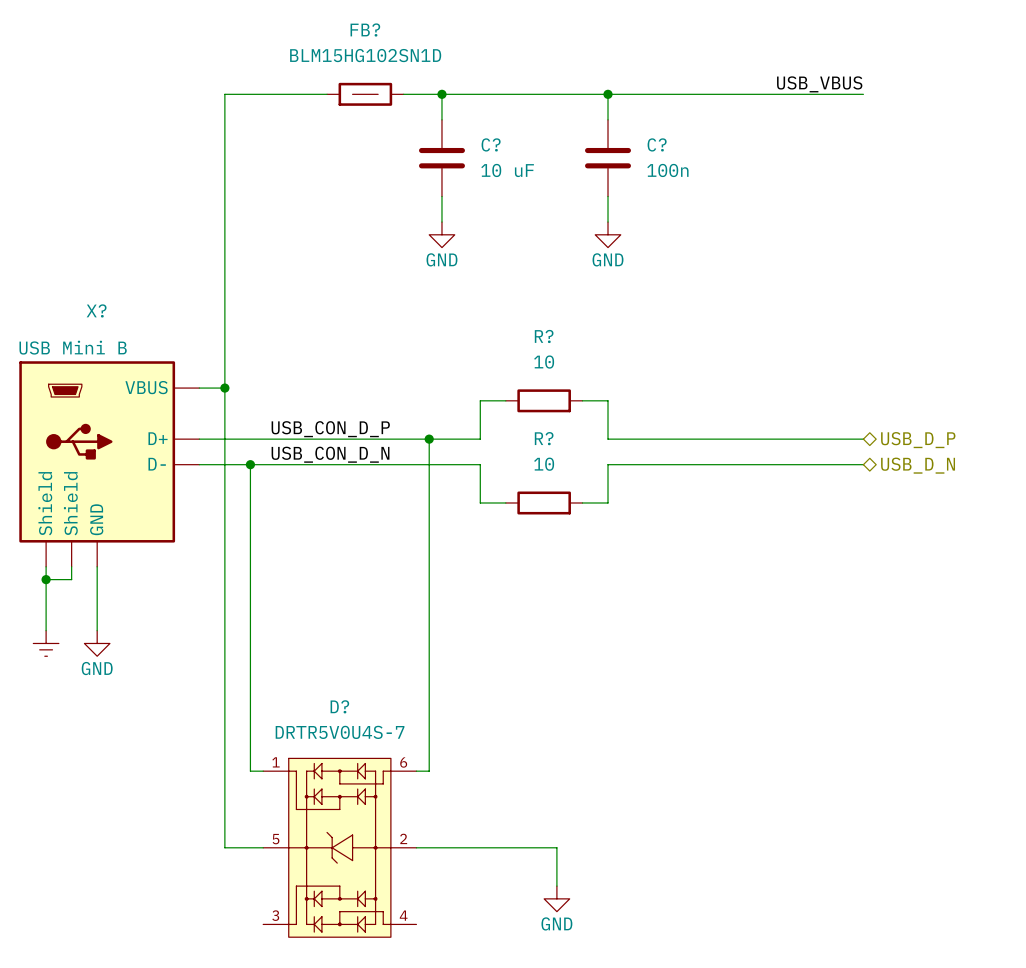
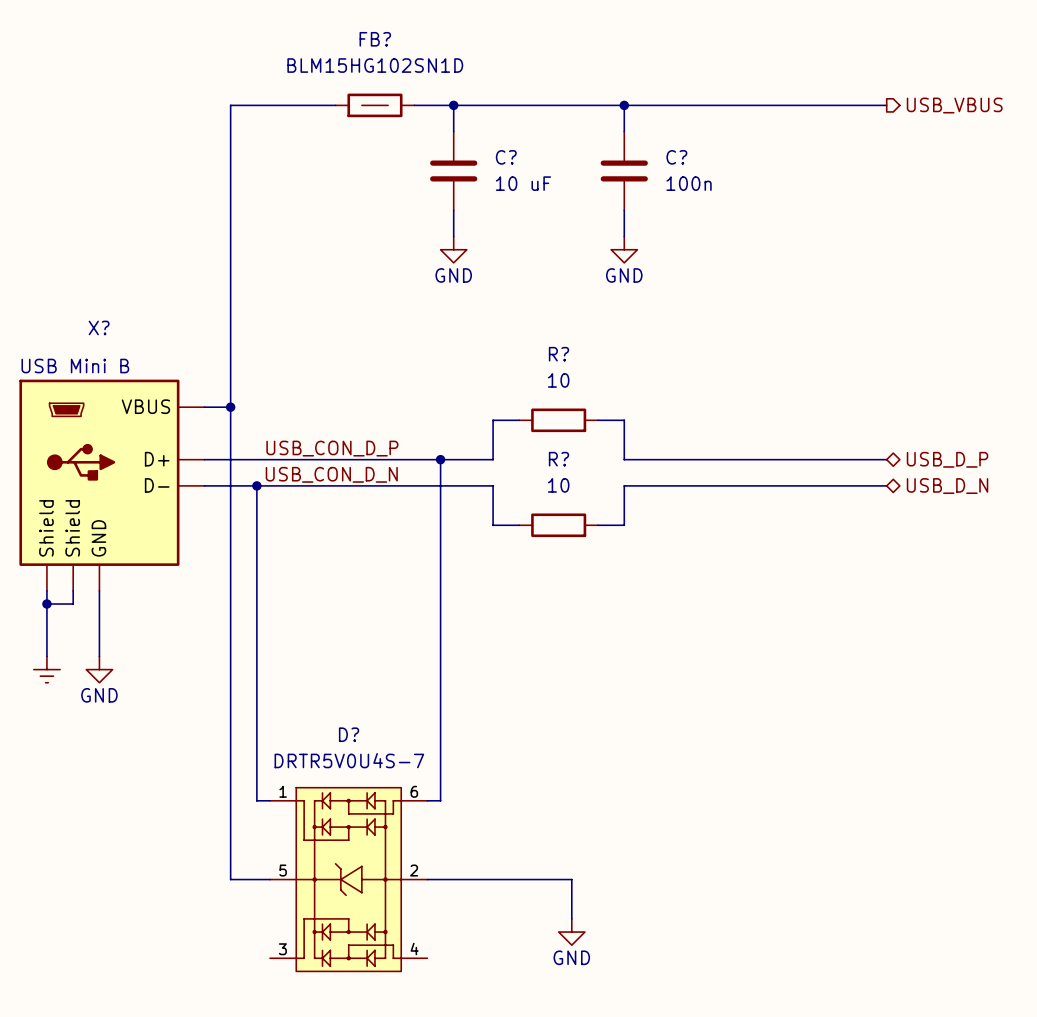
label: USB_VBUS (819, 84) -> none
hierarchical label: none -> USB_VBUS (954, 105)

